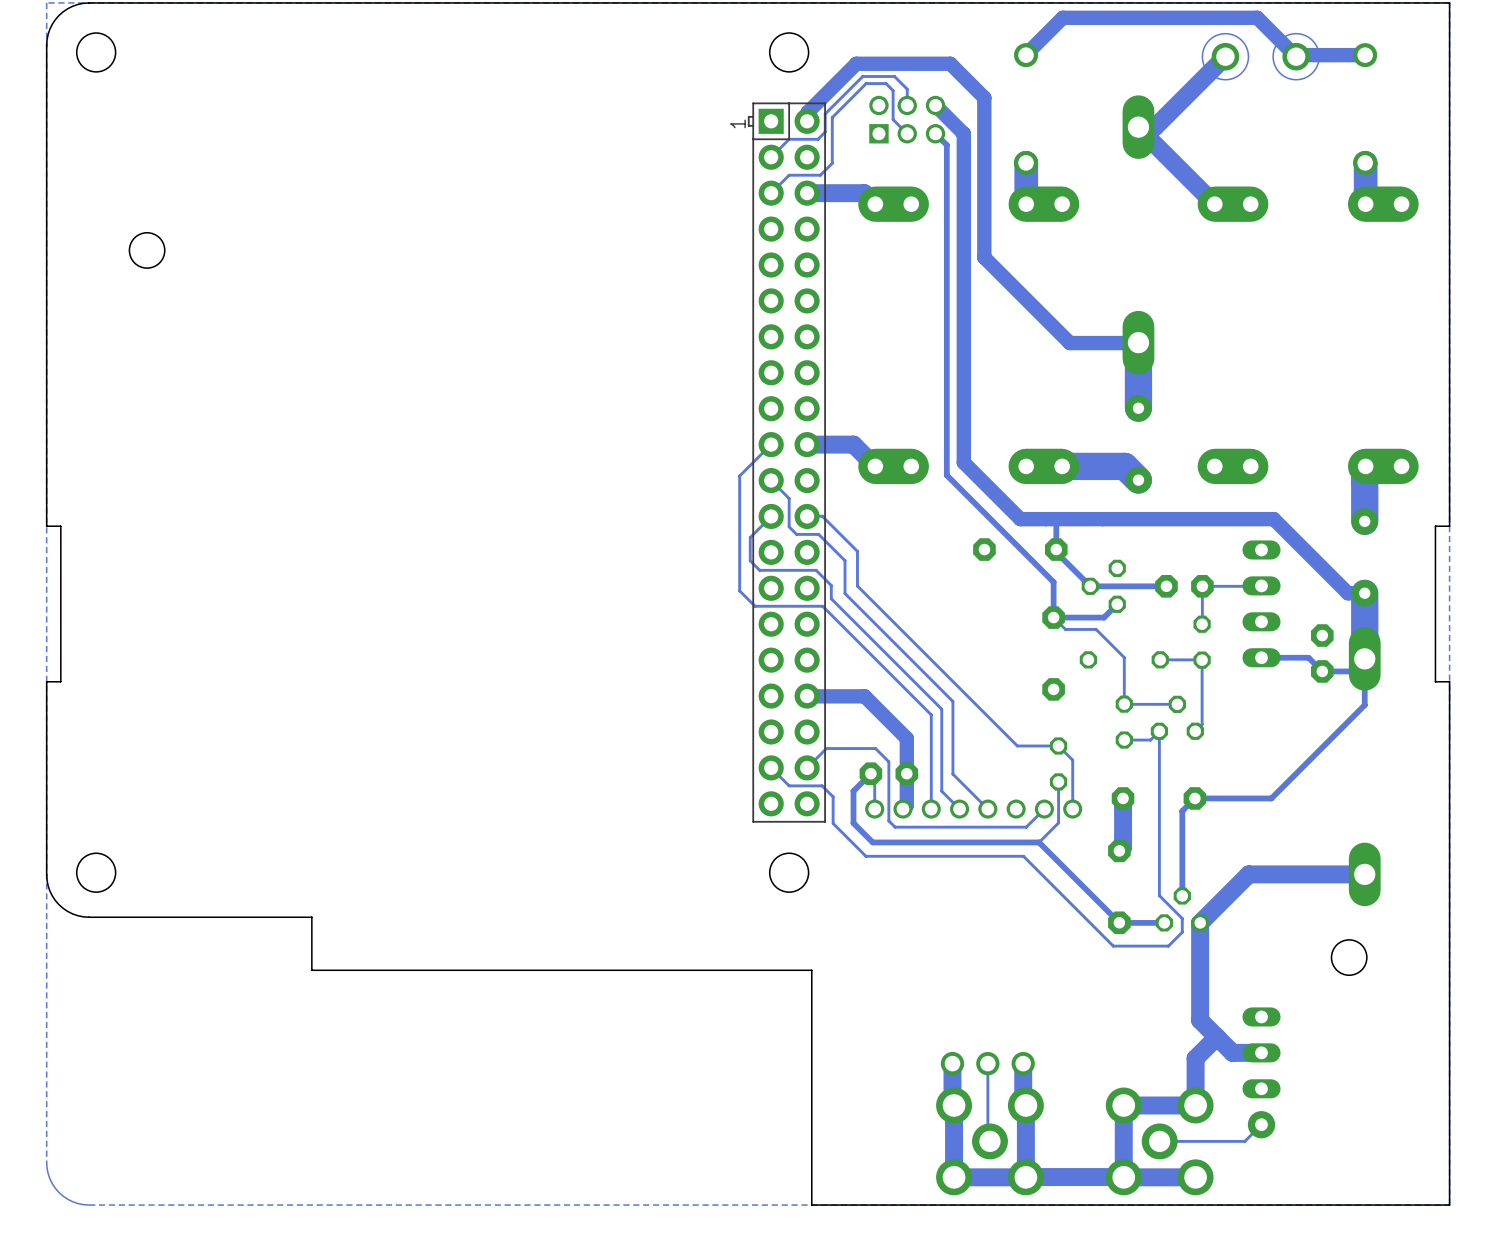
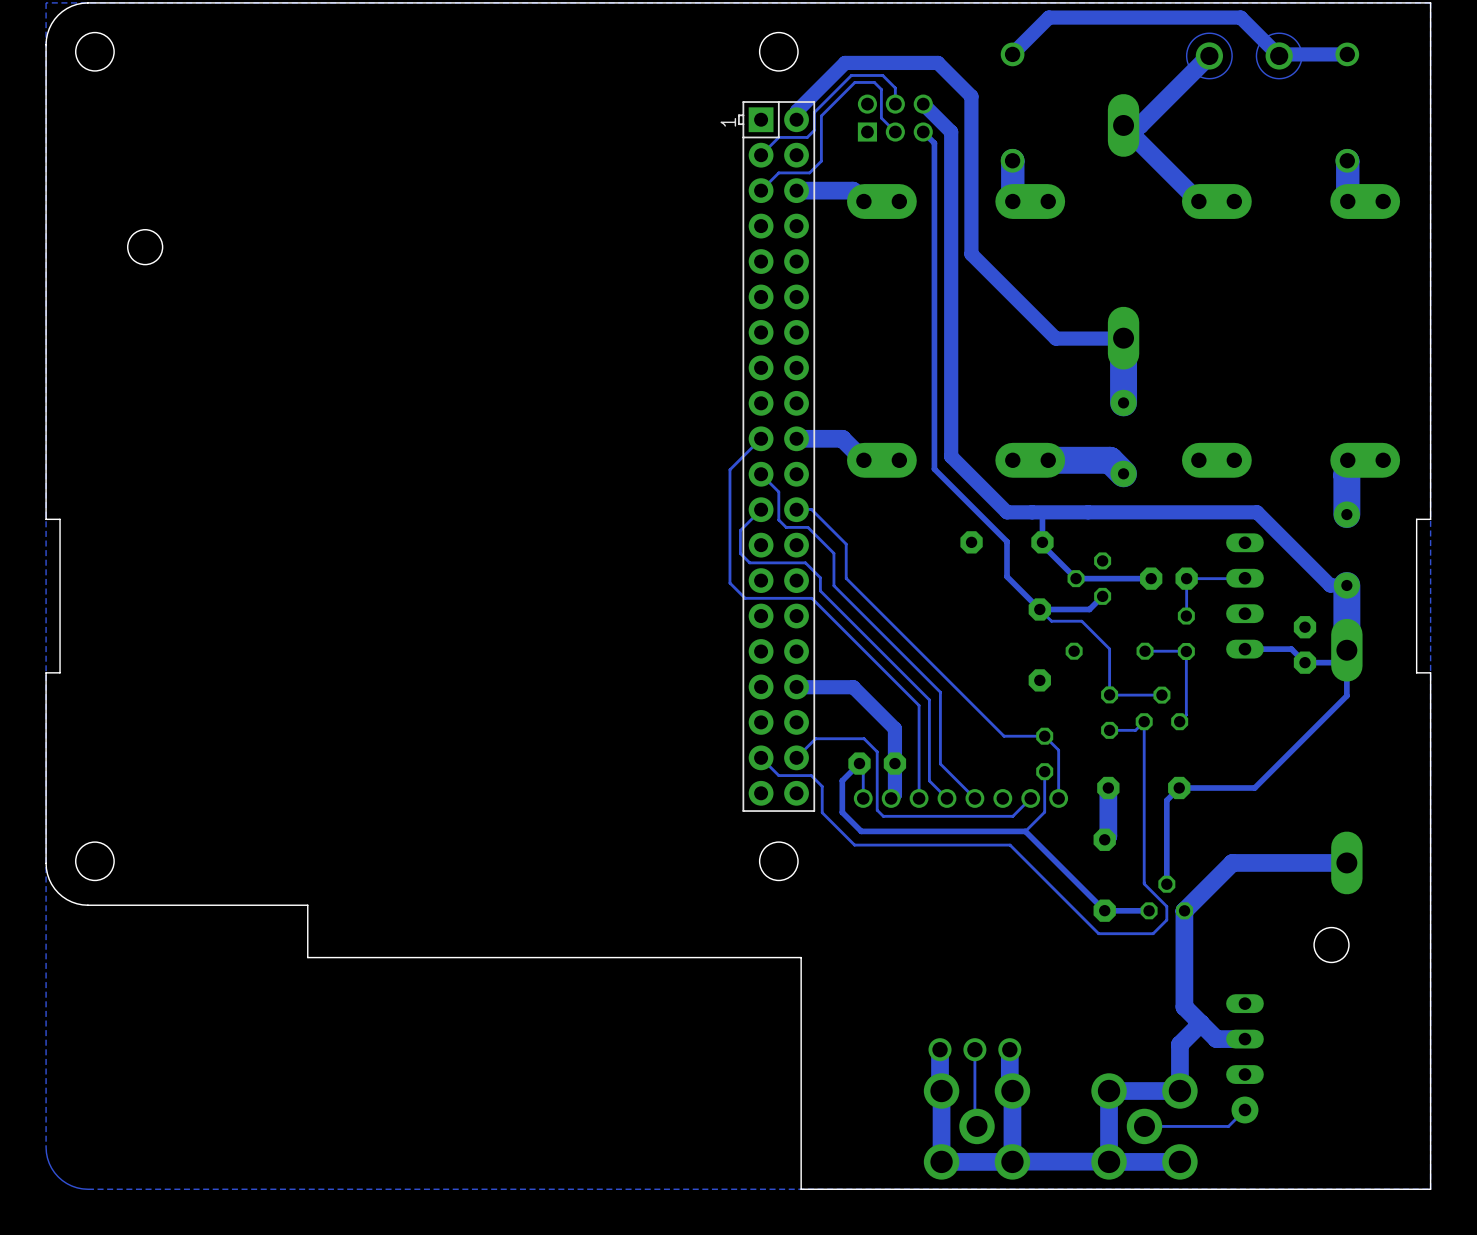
track: (1020, 548) (1053, 582) (1053, 617) -> (1007, 541) (1007, 576) (1039, 609)

